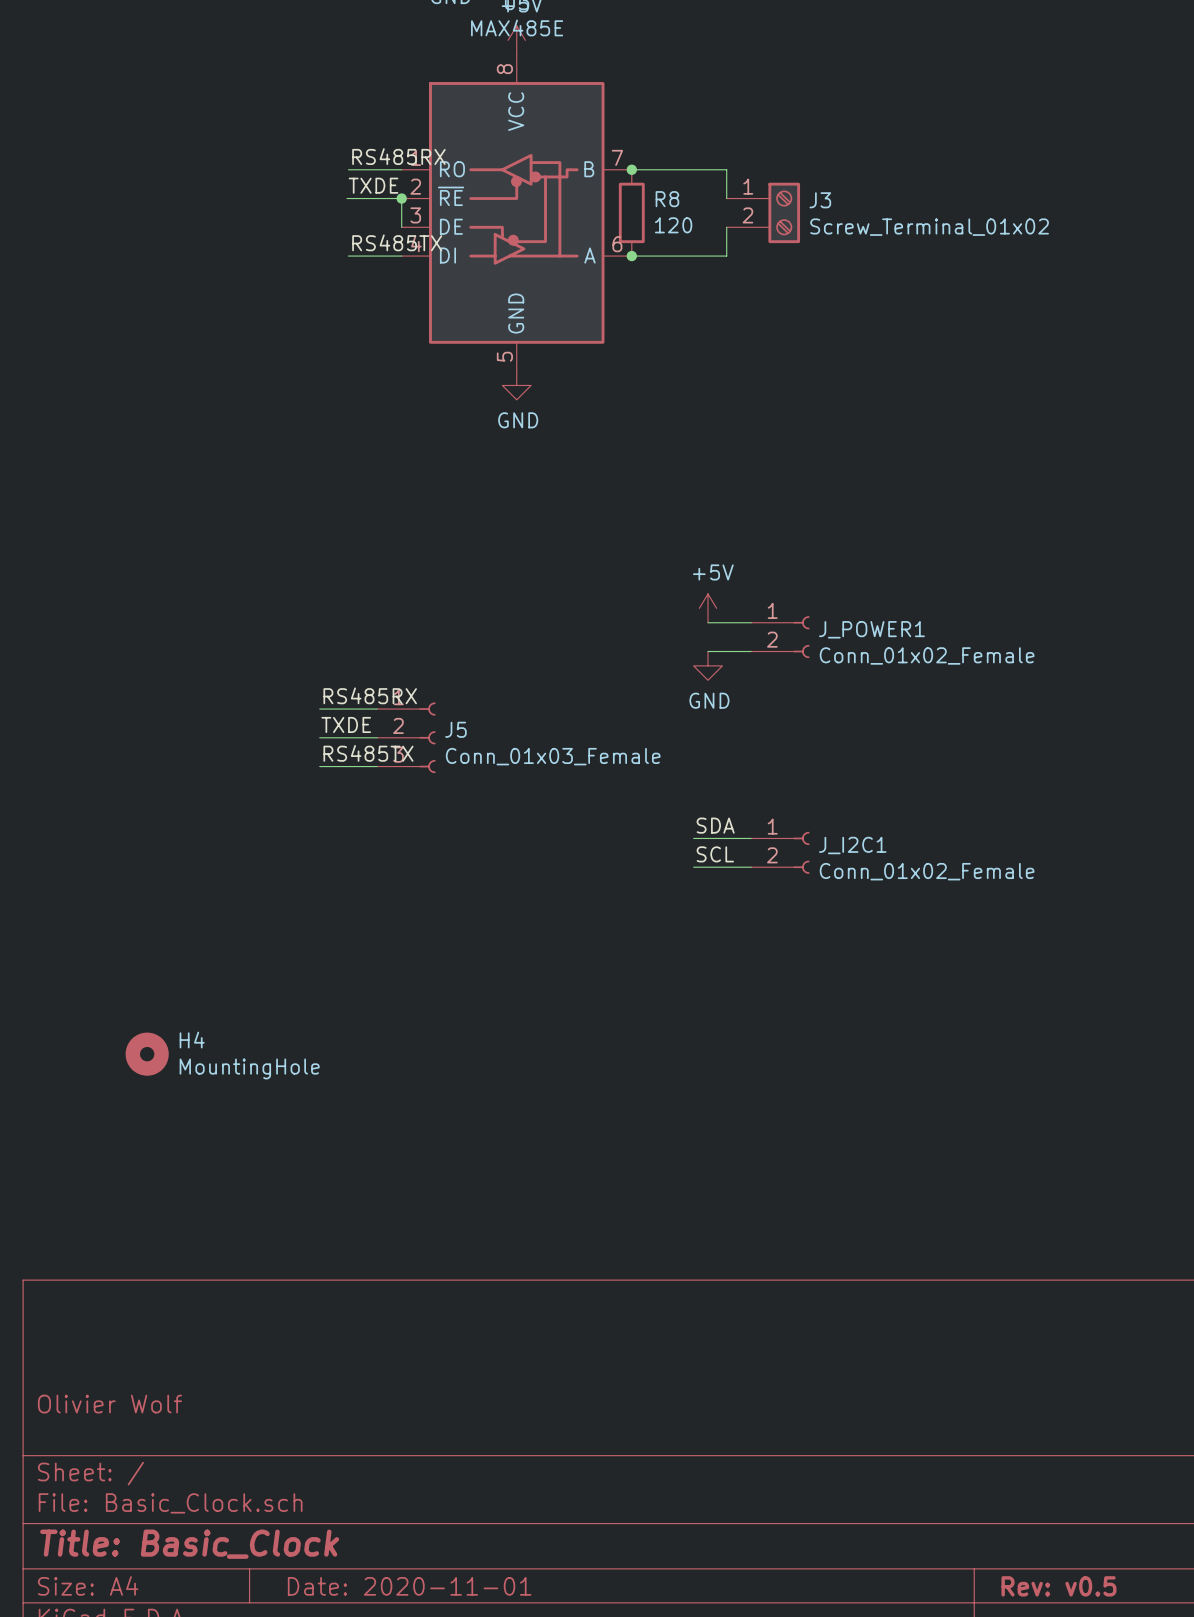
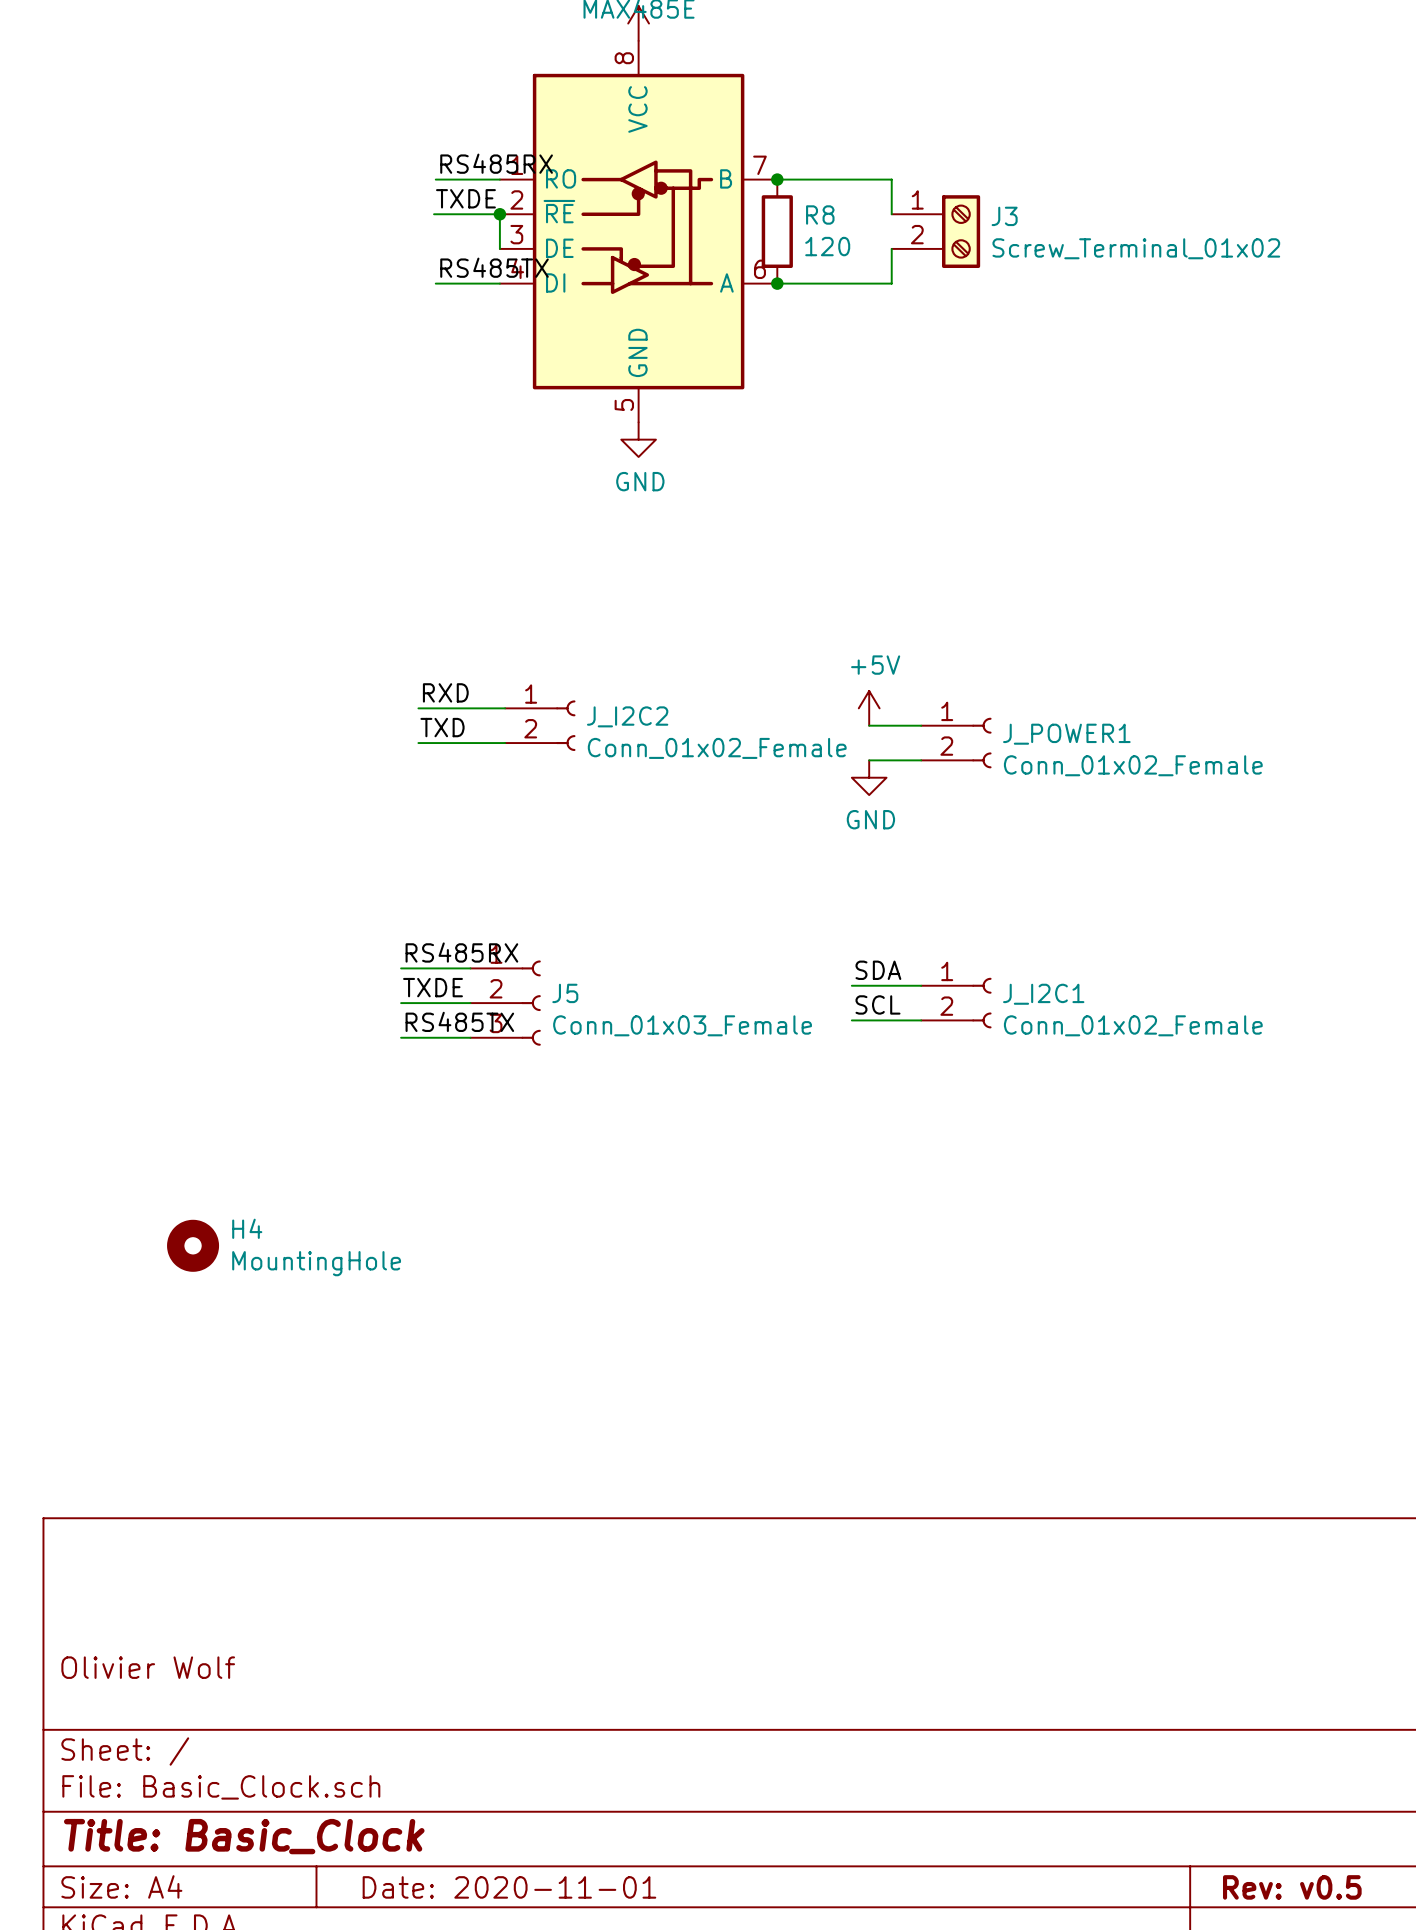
label: none -> RXD (445, 692)
wire: none -> (418, 708) (505, 708)
J_I2C2: none -> Conn_01x02_Female (540, 725)
label: none -> TXD (442, 727)
wire: none -> (418, 743) (505, 743)
label position: RS485RX (370, 695) -> RS485RX (461, 952)
wire: (319, 709) (377, 709) -> (401, 1037) (470, 1037)
label position: TXDE (346, 724) -> TXDE (433, 987)
wire: (319, 737) (377, 737) -> (401, 1003) (470, 1003)
J5 position: (406, 737) -> (505, 1003)
label position: RS485TX (368, 753) -> RS485TX (459, 1021)
wire: (319, 766) (377, 766) -> (401, 968) (470, 968)

